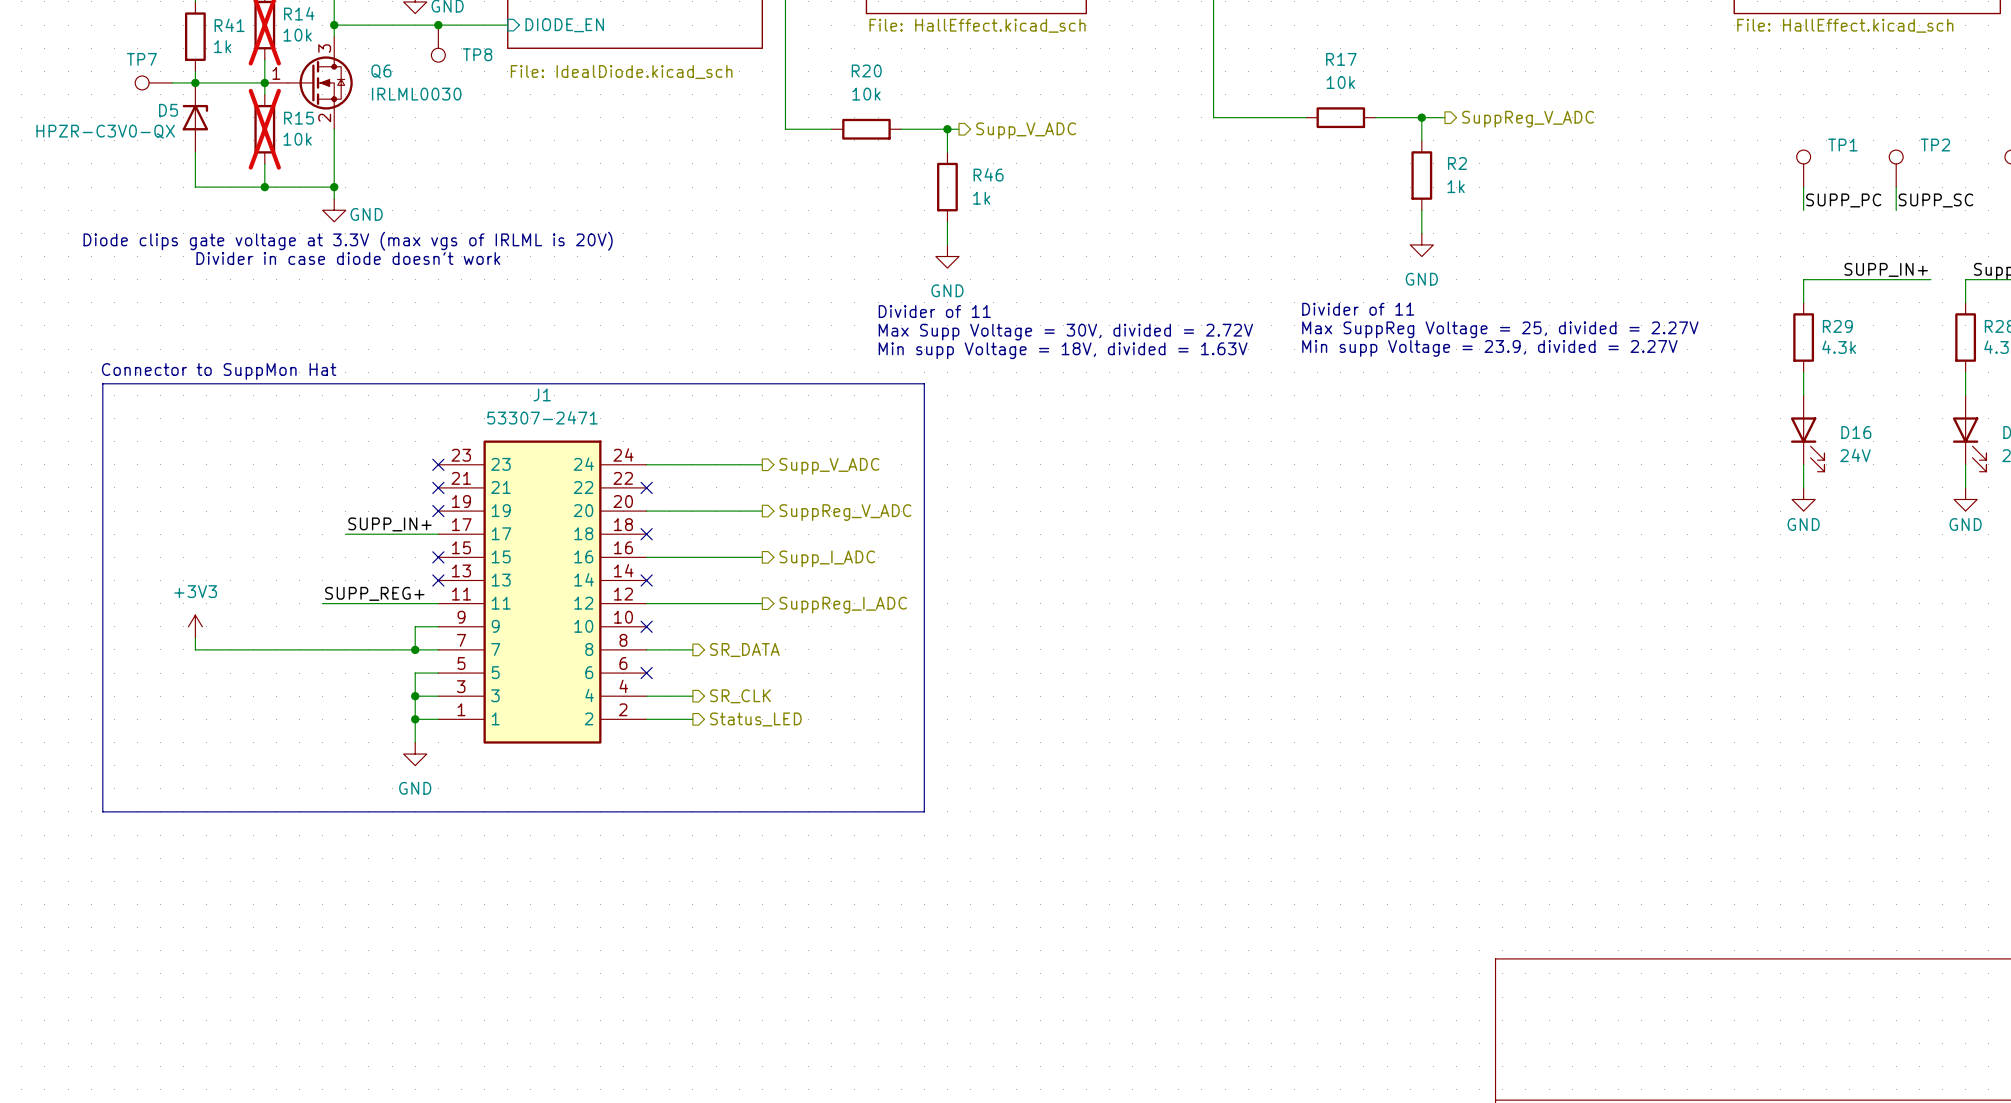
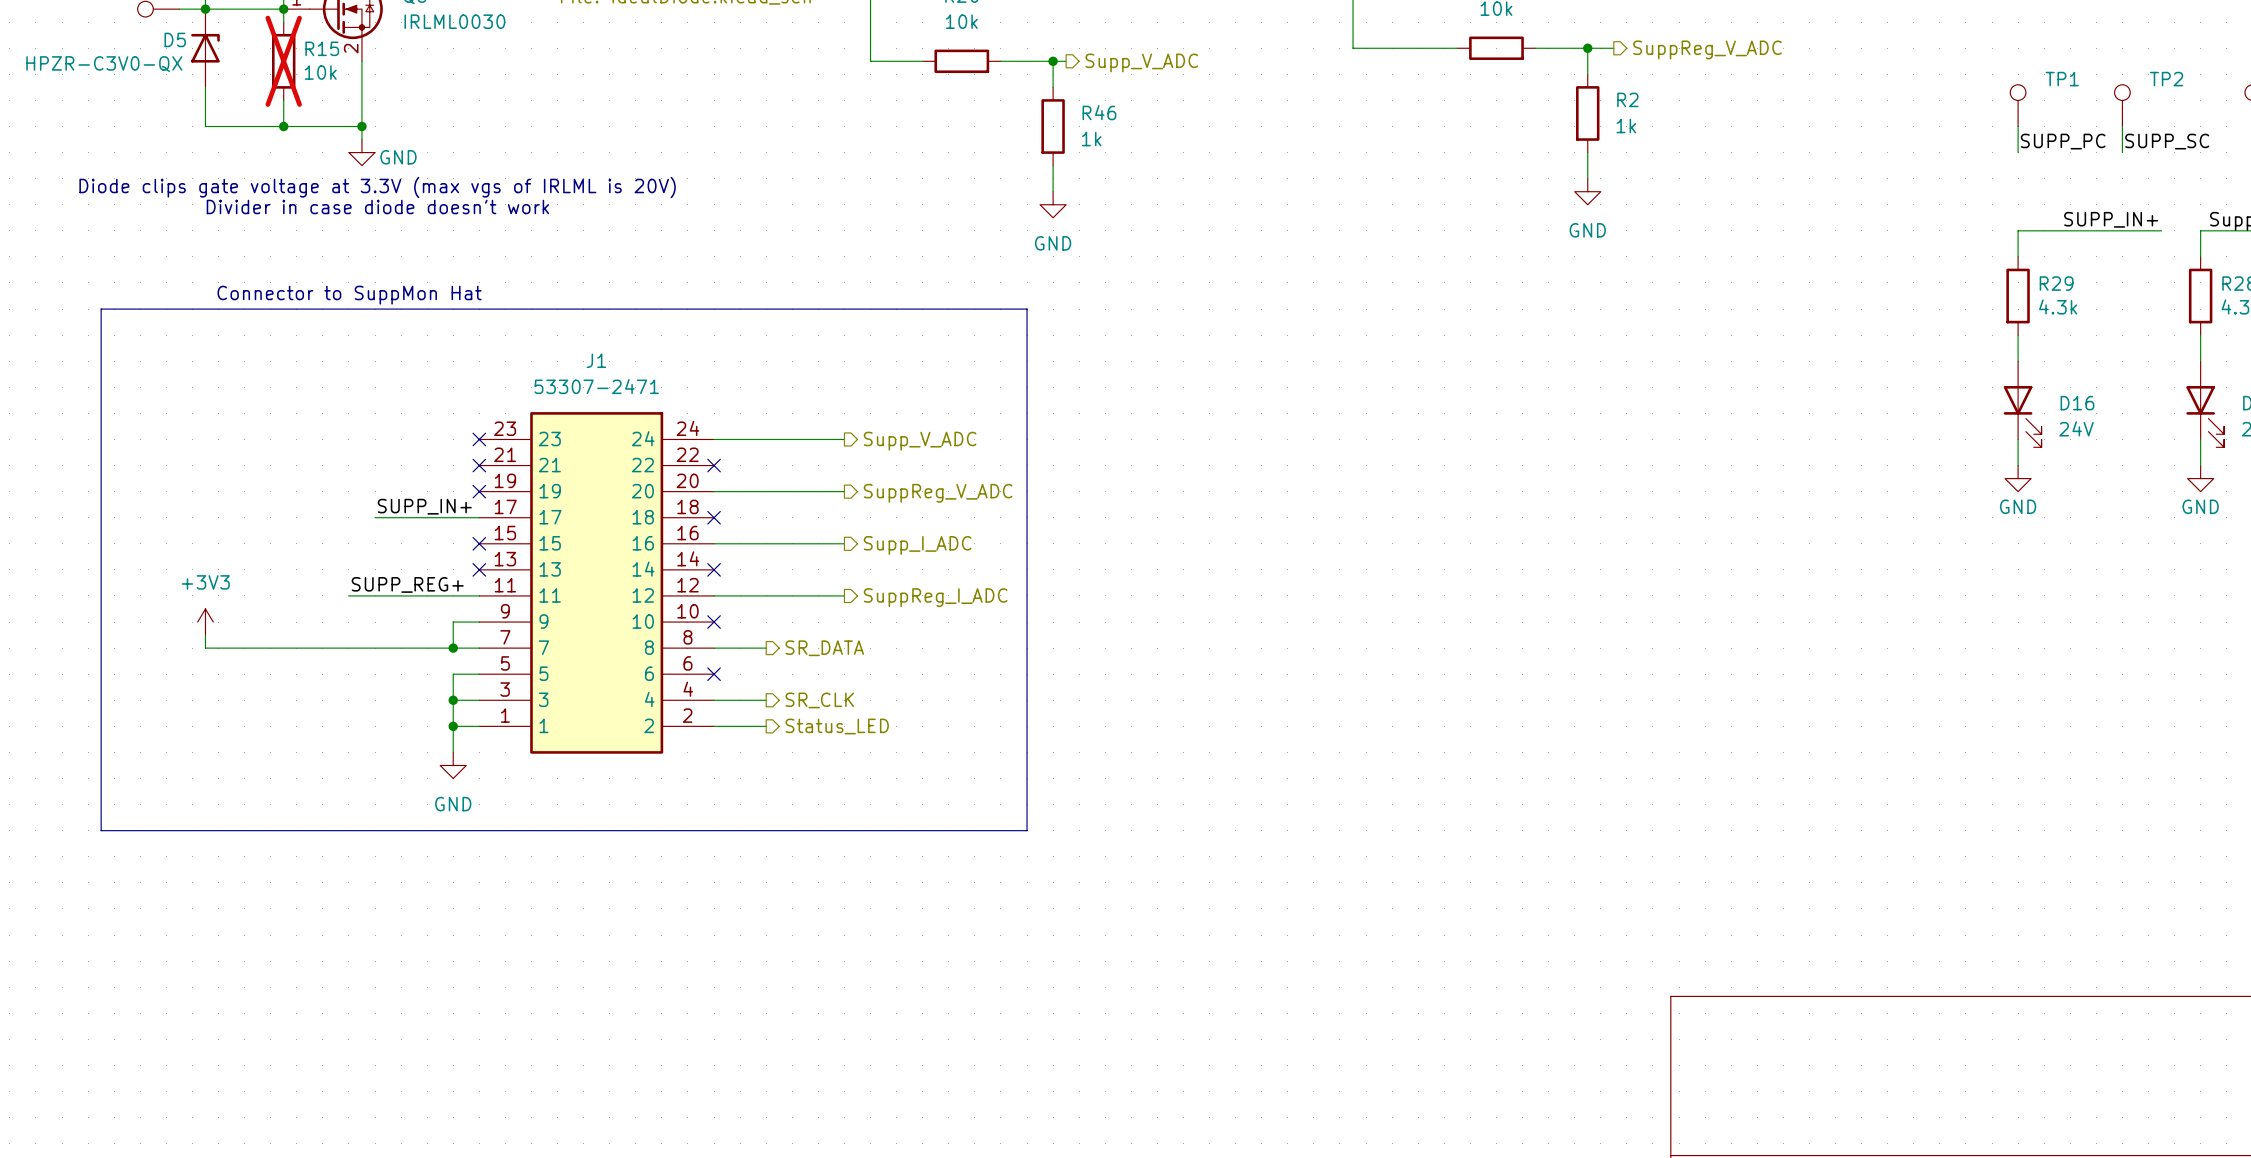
text: Divider of 11 (1358, 309) -> none
text: Divider of 11 (934, 311) -> none
text: Max SuppReg Voltage = 25, divided = 2.27V (1500, 329) -> none
text: Max Supp Voltage = 30V, divided = 2.72V (1065, 332) -> none
text: Min supp Voltage = 23.9, divided = 2.27V (1489, 348) -> none
text: Min supp Voltage = 18V, divided = 1.63V (1063, 350) -> none
text position: Connector to SuppMon Hat (219, 371) -> Connector to SuppMon Hat (349, 295)
line: (102, 383) (924, 383) -> (101, 348) (101, 309) (1027, 309) (1027, 348)

